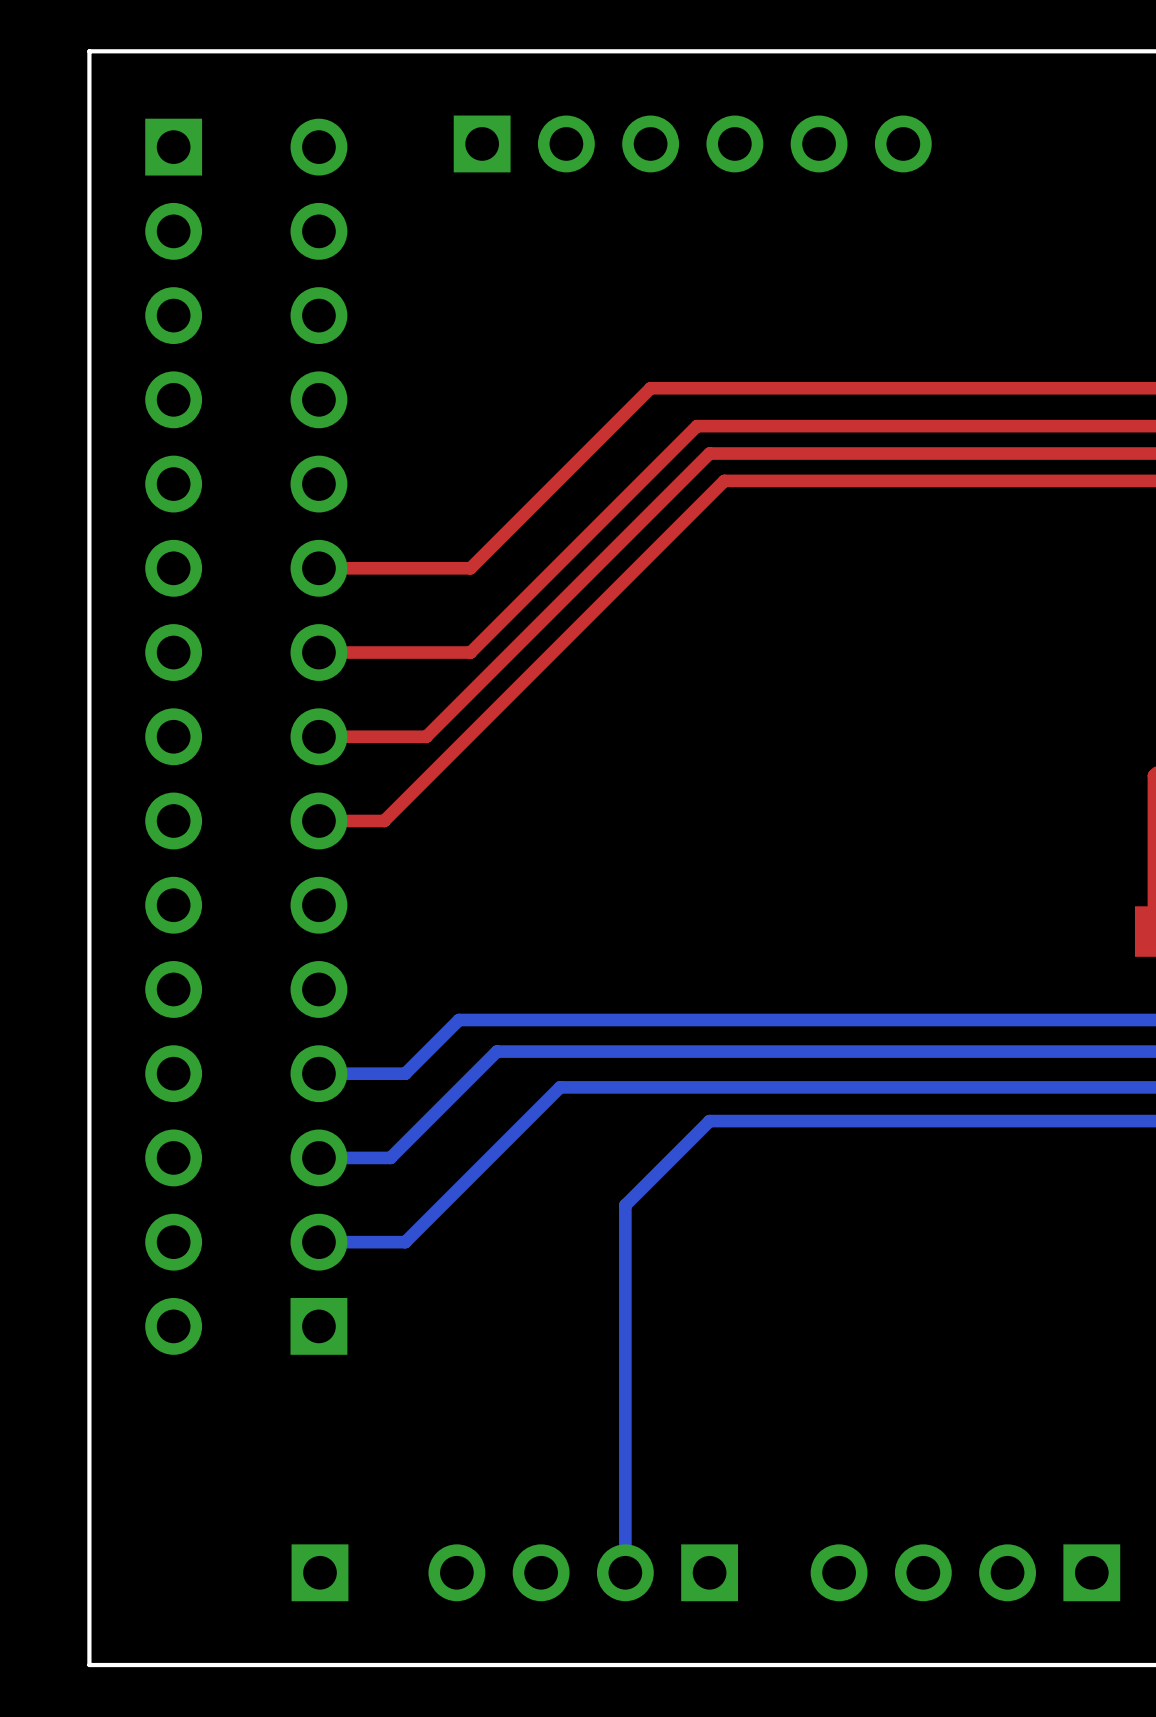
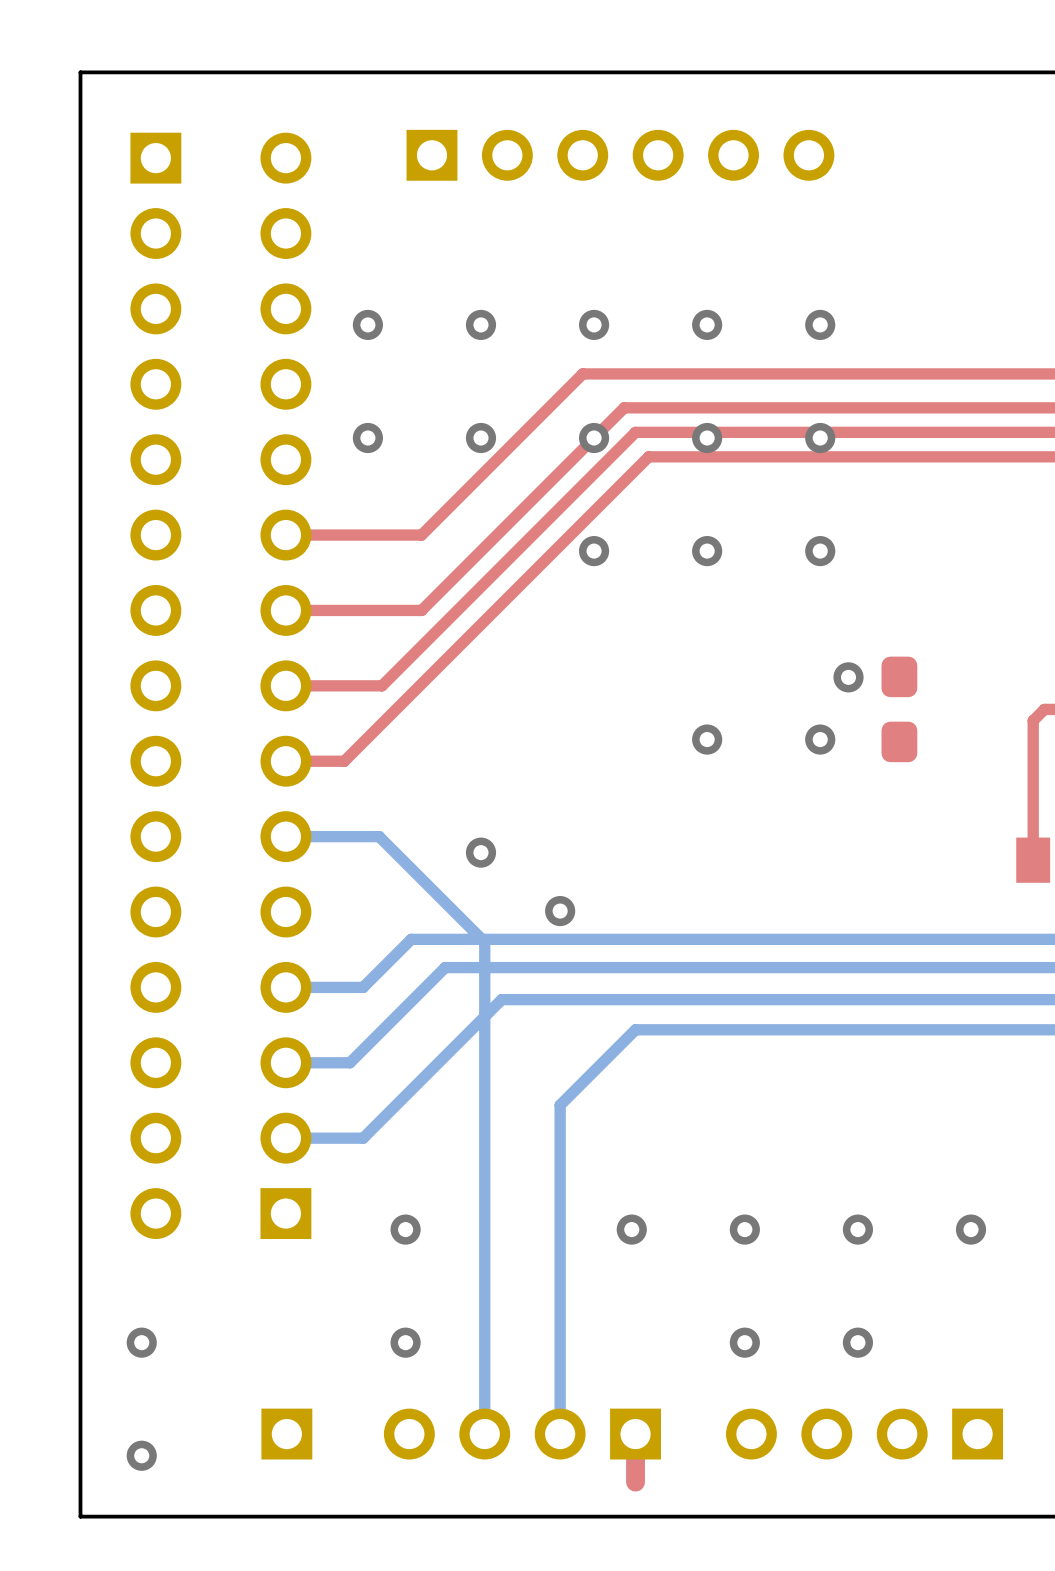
via: none -> (367, 324)
via: none -> (480, 324)
via: none -> (594, 324)
via: none -> (707, 324)
via: none -> (820, 324)
via: none -> (367, 438)
via: none -> (480, 438)
via: none -> (594, 438)
via: none -> (707, 438)
via: none -> (820, 438)
via: none -> (594, 551)
via: none -> (707, 551)
via: none -> (820, 551)
via: none -> (848, 677)
part: none -> (899, 709)
via: none -> (707, 739)
via: none -> (820, 739)
bottom track: none -> (285, 836) (379, 836) (484, 942) (484, 1434)
via: none -> (480, 852)
via: none -> (560, 911)
via: none -> (405, 1229)
via: none -> (631, 1229)
via: none -> (744, 1229)
via: none -> (857, 1229)
via: none -> (971, 1229)
via: none -> (141, 1342)
via: none -> (405, 1342)
via: none -> (744, 1342)
via: none -> (857, 1342)
top track: none -> (635, 1434) (635, 1482)
via: none -> (141, 1455)

